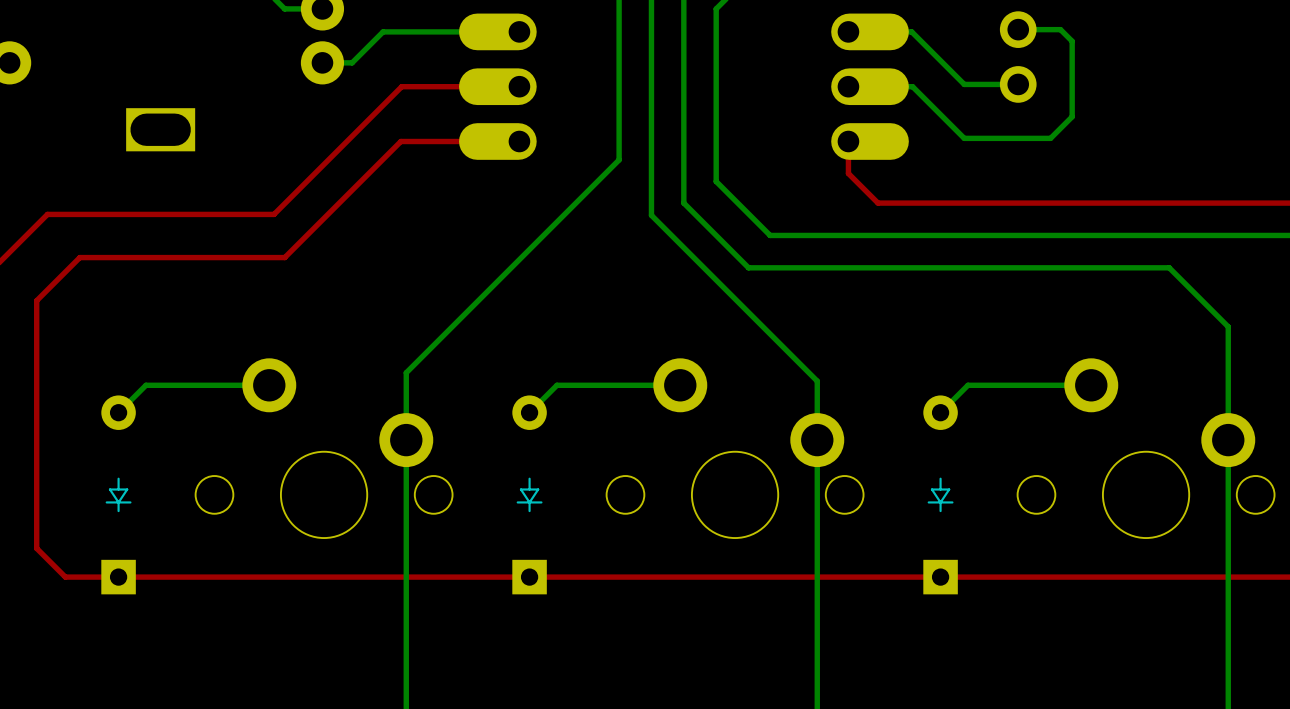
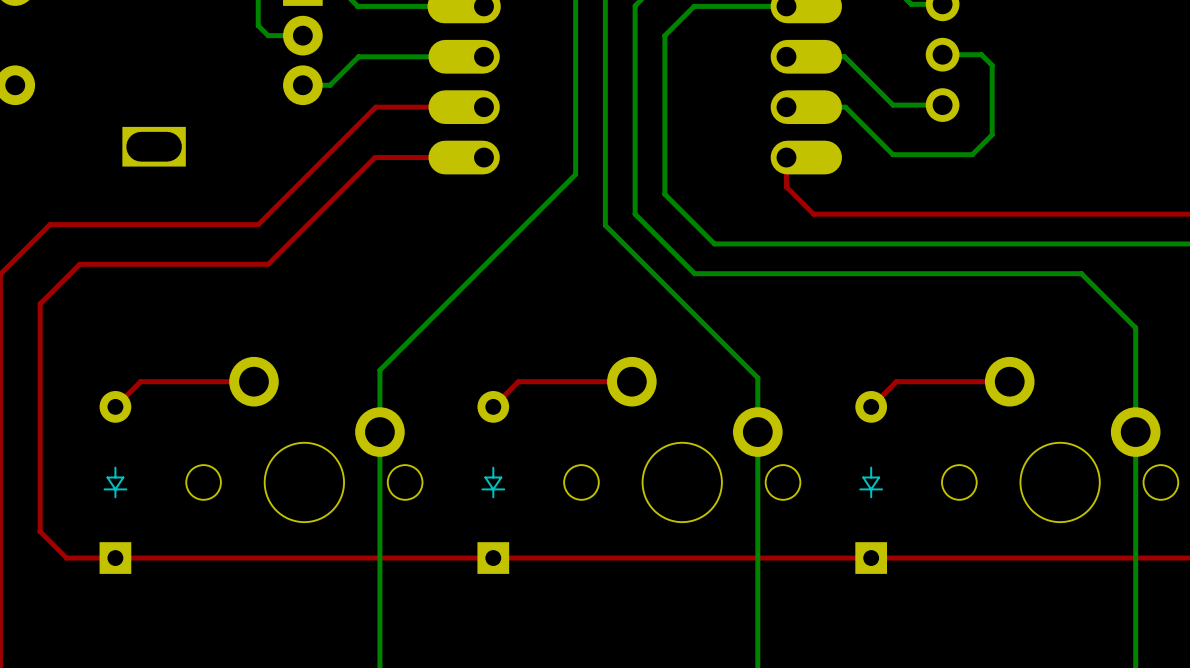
bottom track: (269, 385) (145, 385) (118, 412) -> none
top track: none -> (253, 381) (140, 381) (115, 406)
bottom track: (680, 385) (556, 385) (529, 412) -> none
top track: none -> (631, 381) (518, 381) (493, 406)
bottom track: (1091, 385) (967, 385) (940, 412) -> none
top track: none -> (1009, 381) (896, 381) (871, 406)

